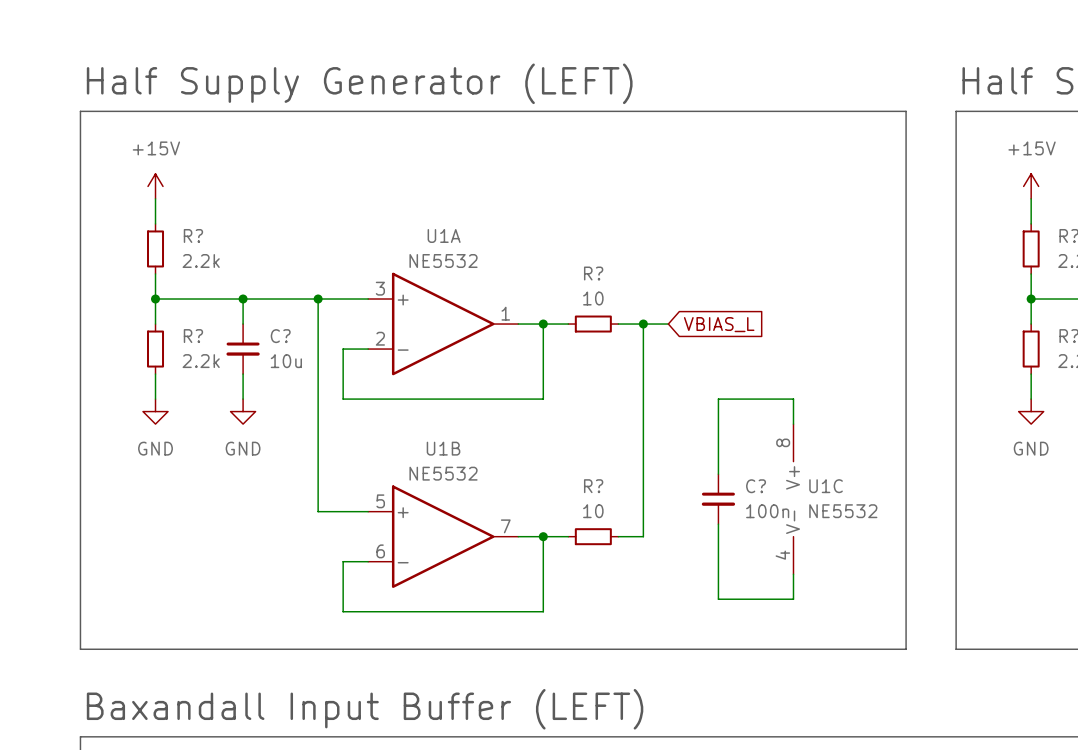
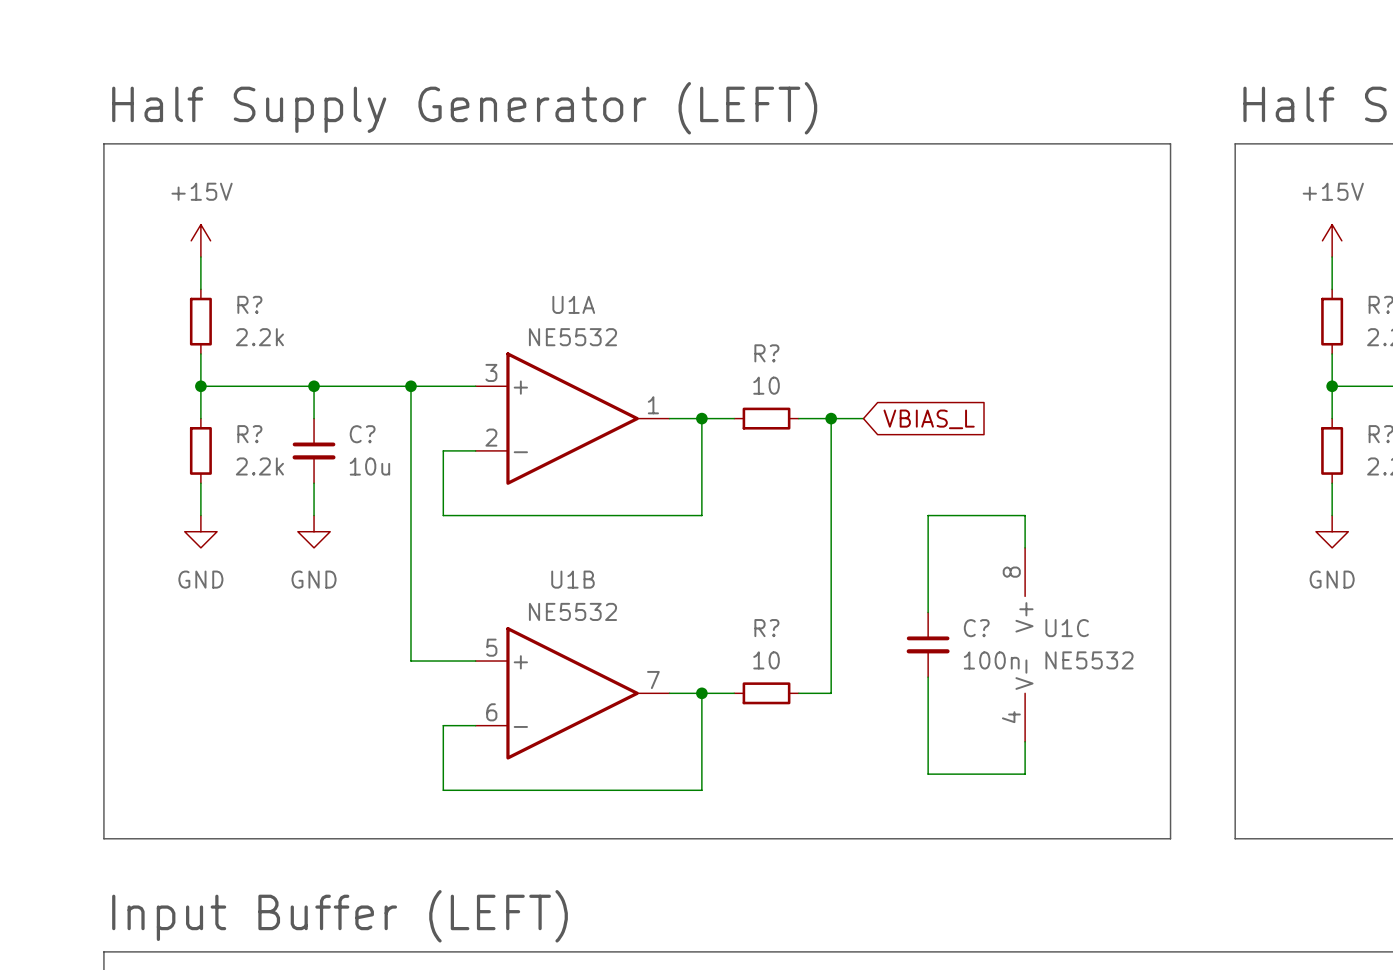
text: Baxandall Input Buffer (LEFT) (365, 709) -> Input Buffer (LEFT) (340, 916)

